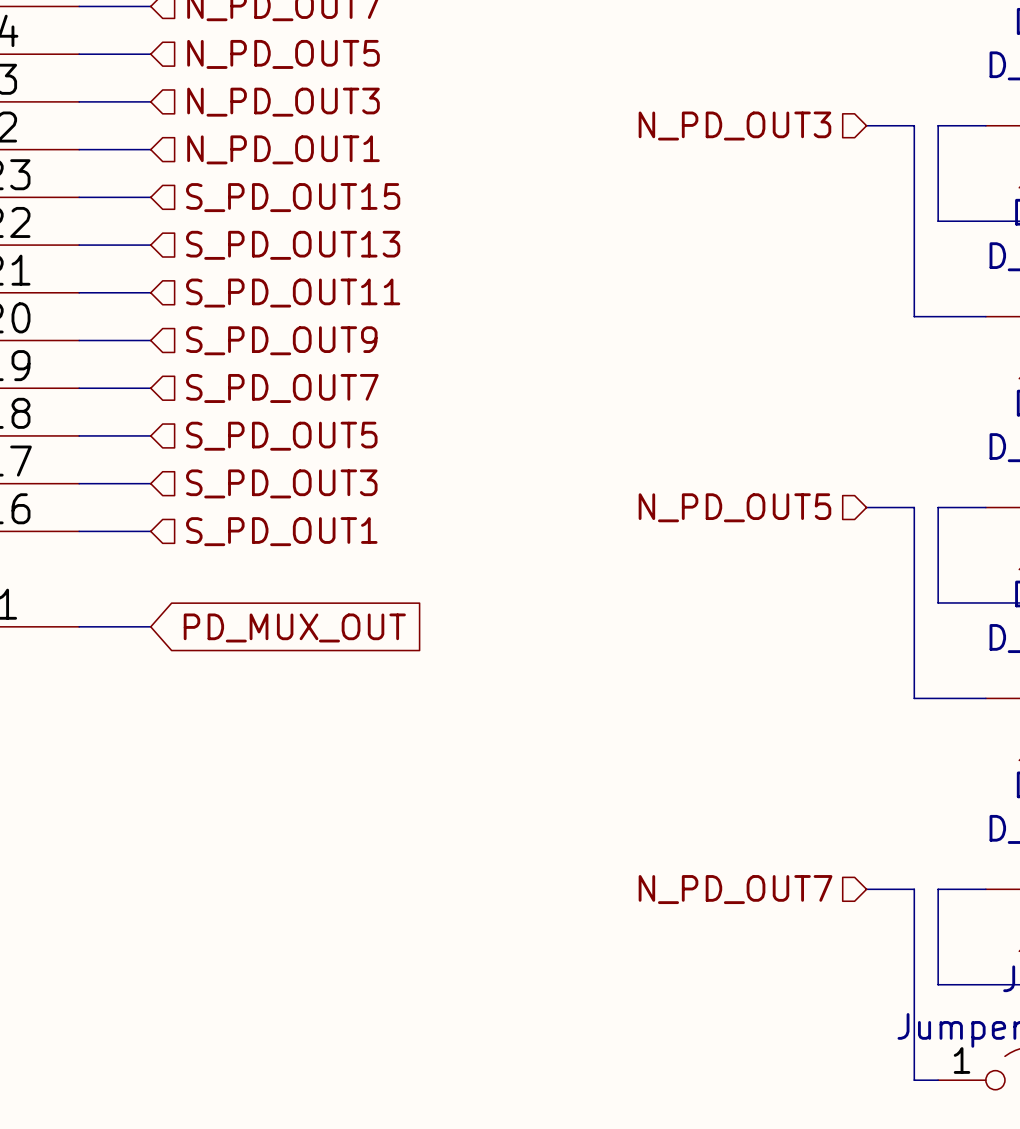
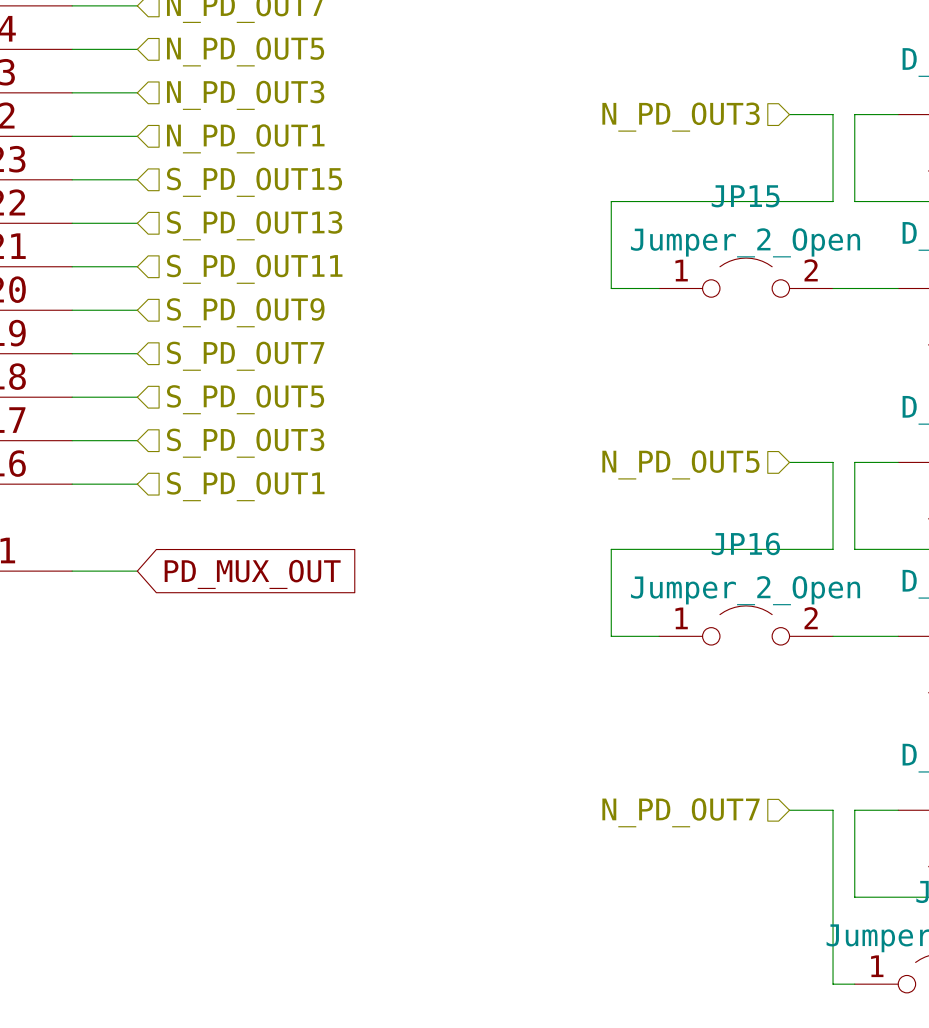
wire: (914, 221) (914, 316) -> (833, 201) (611, 201) (611, 288) (659, 288)
JP15: none -> Jumper_2_Open (746, 277)
wire: (914, 602) (914, 698) -> (833, 549) (611, 549) (611, 636) (659, 636)
JP16: none -> Jumper_2_Open (746, 625)

